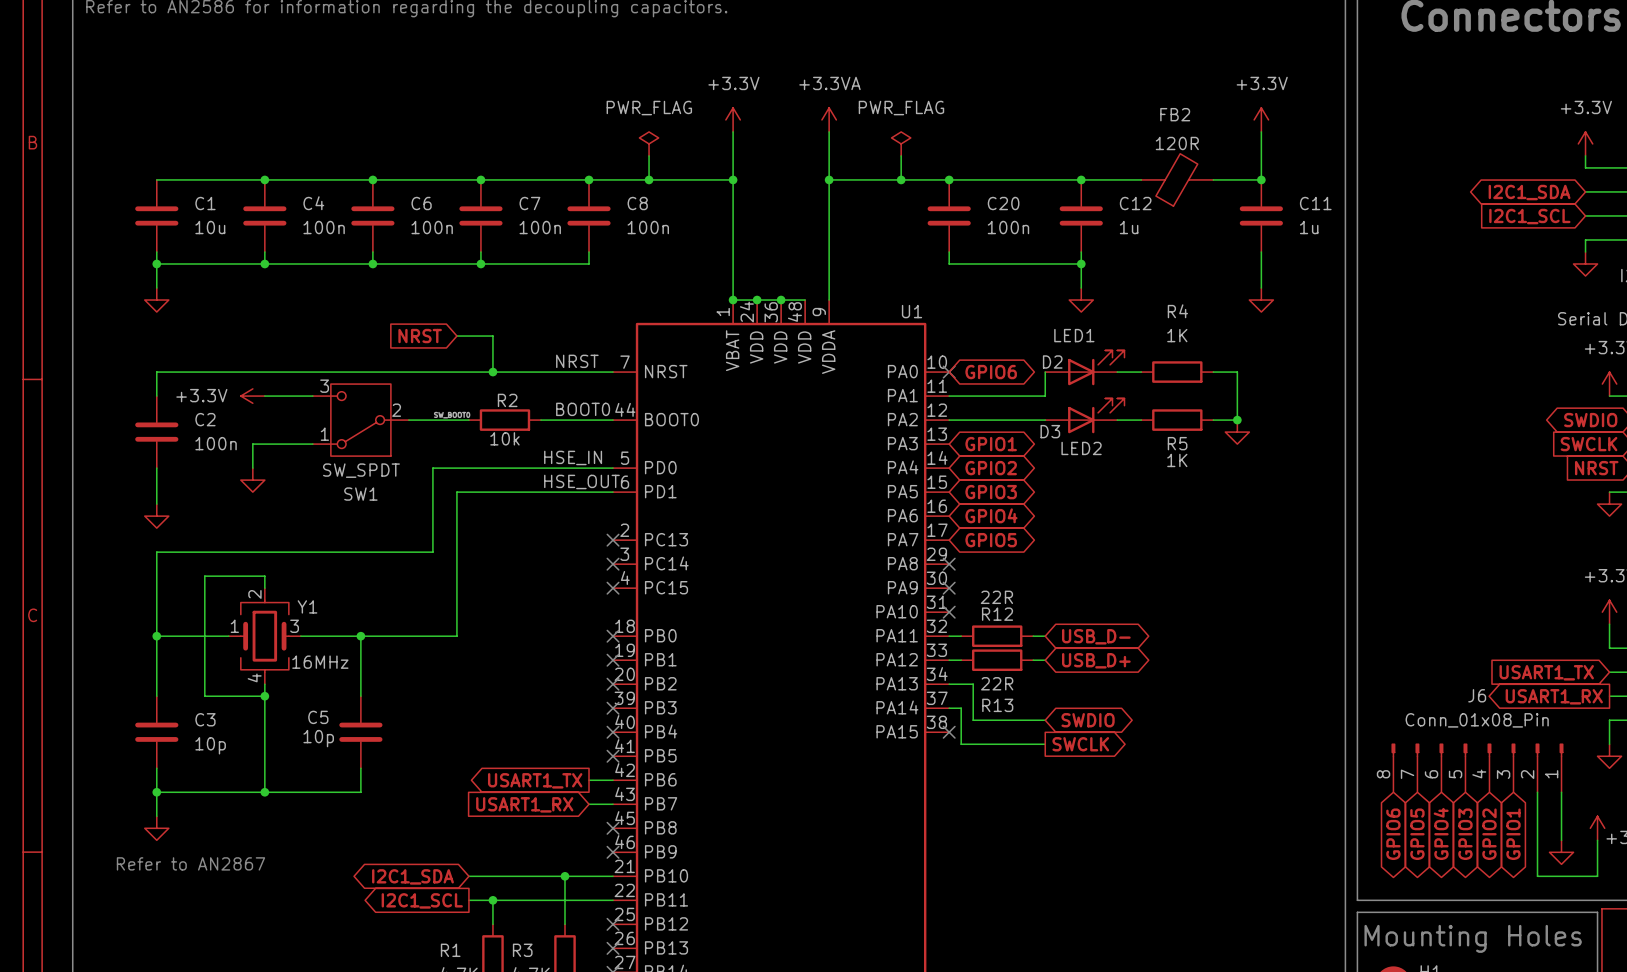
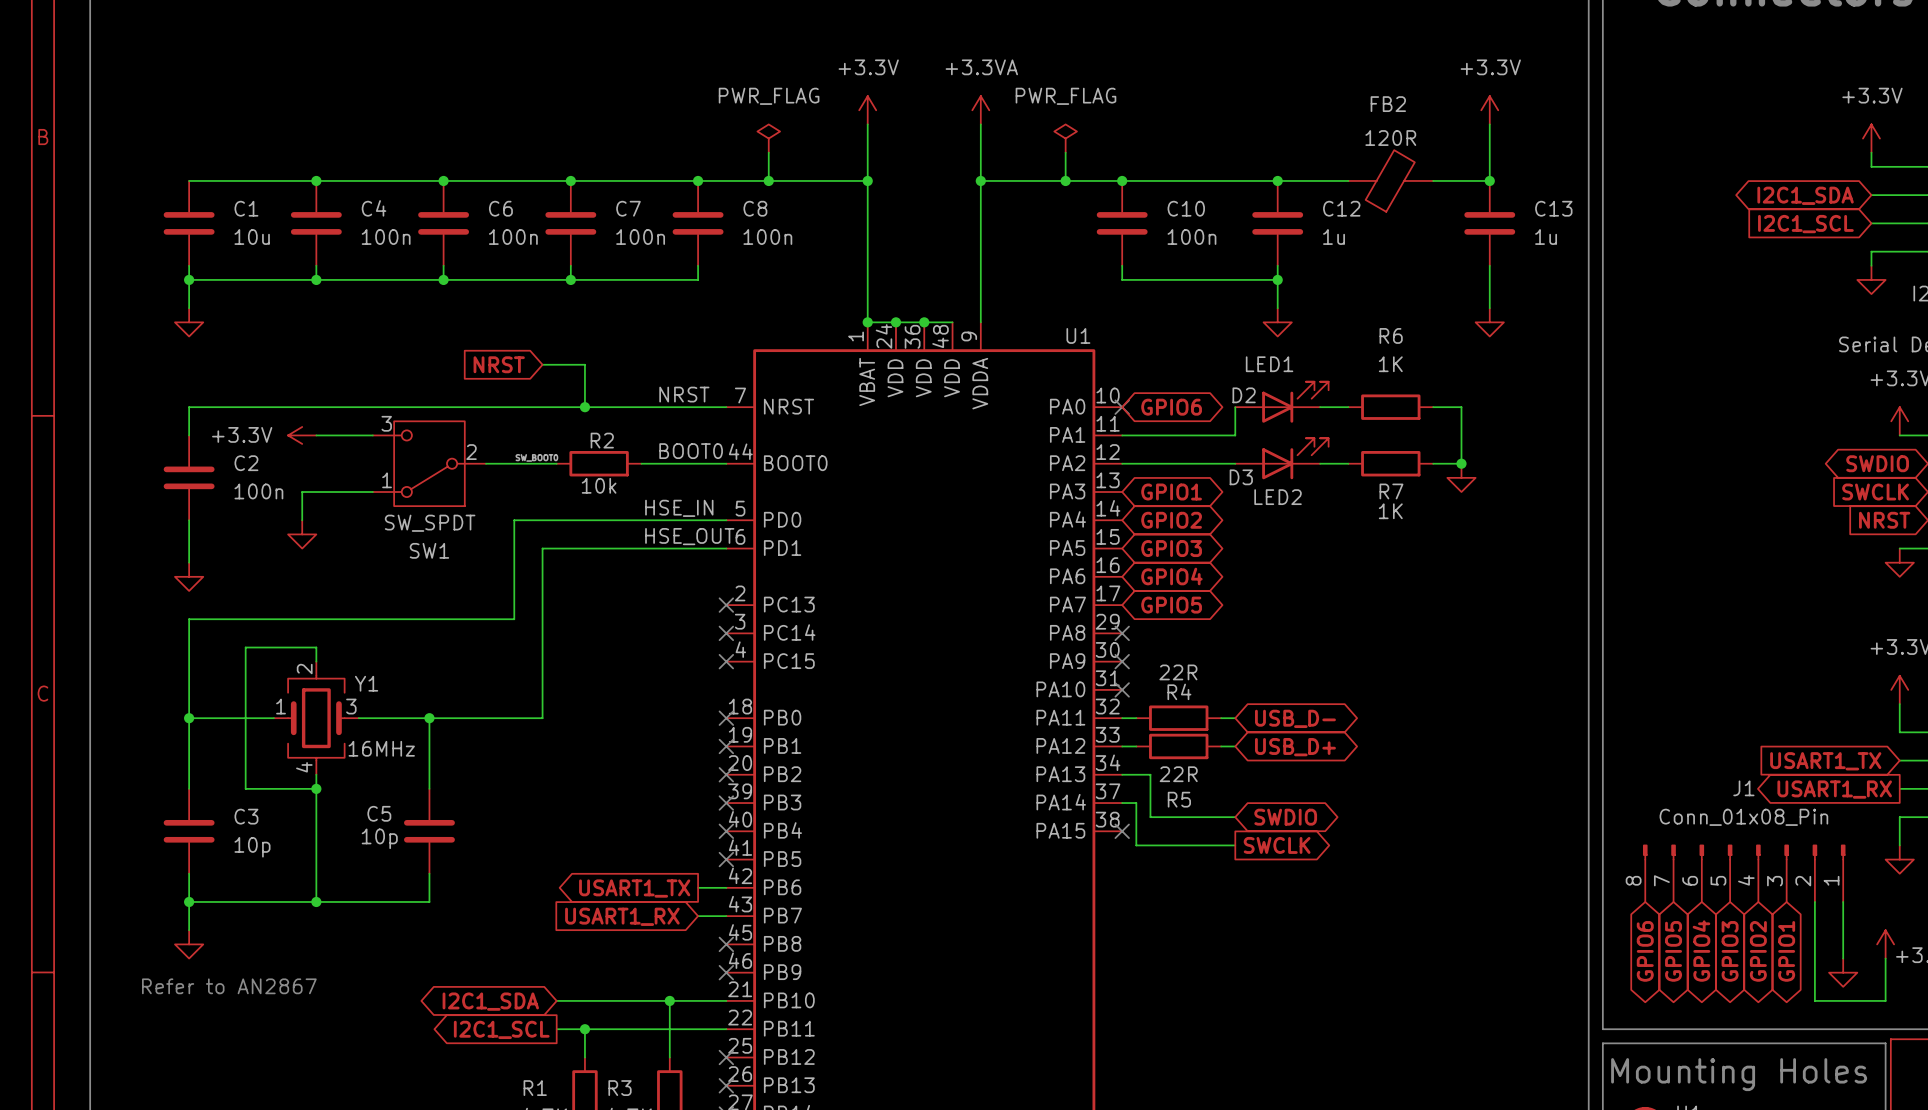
C20 name: C20 (1003, 203) -> C10 (1186, 208)
C11 name: C11 (1315, 203) -> C13 (1553, 208)
R4 name: R4 (1177, 311) -> R6 (1391, 335)
R5 name: R5 (1177, 443) -> R7 (1391, 491)
R12 name: R12 (997, 614) -> R4 (1179, 691)
J6 name: J6 (1477, 695) -> J1 (1743, 788)
R13 name: R13 (997, 705) -> R5 (1179, 799)

